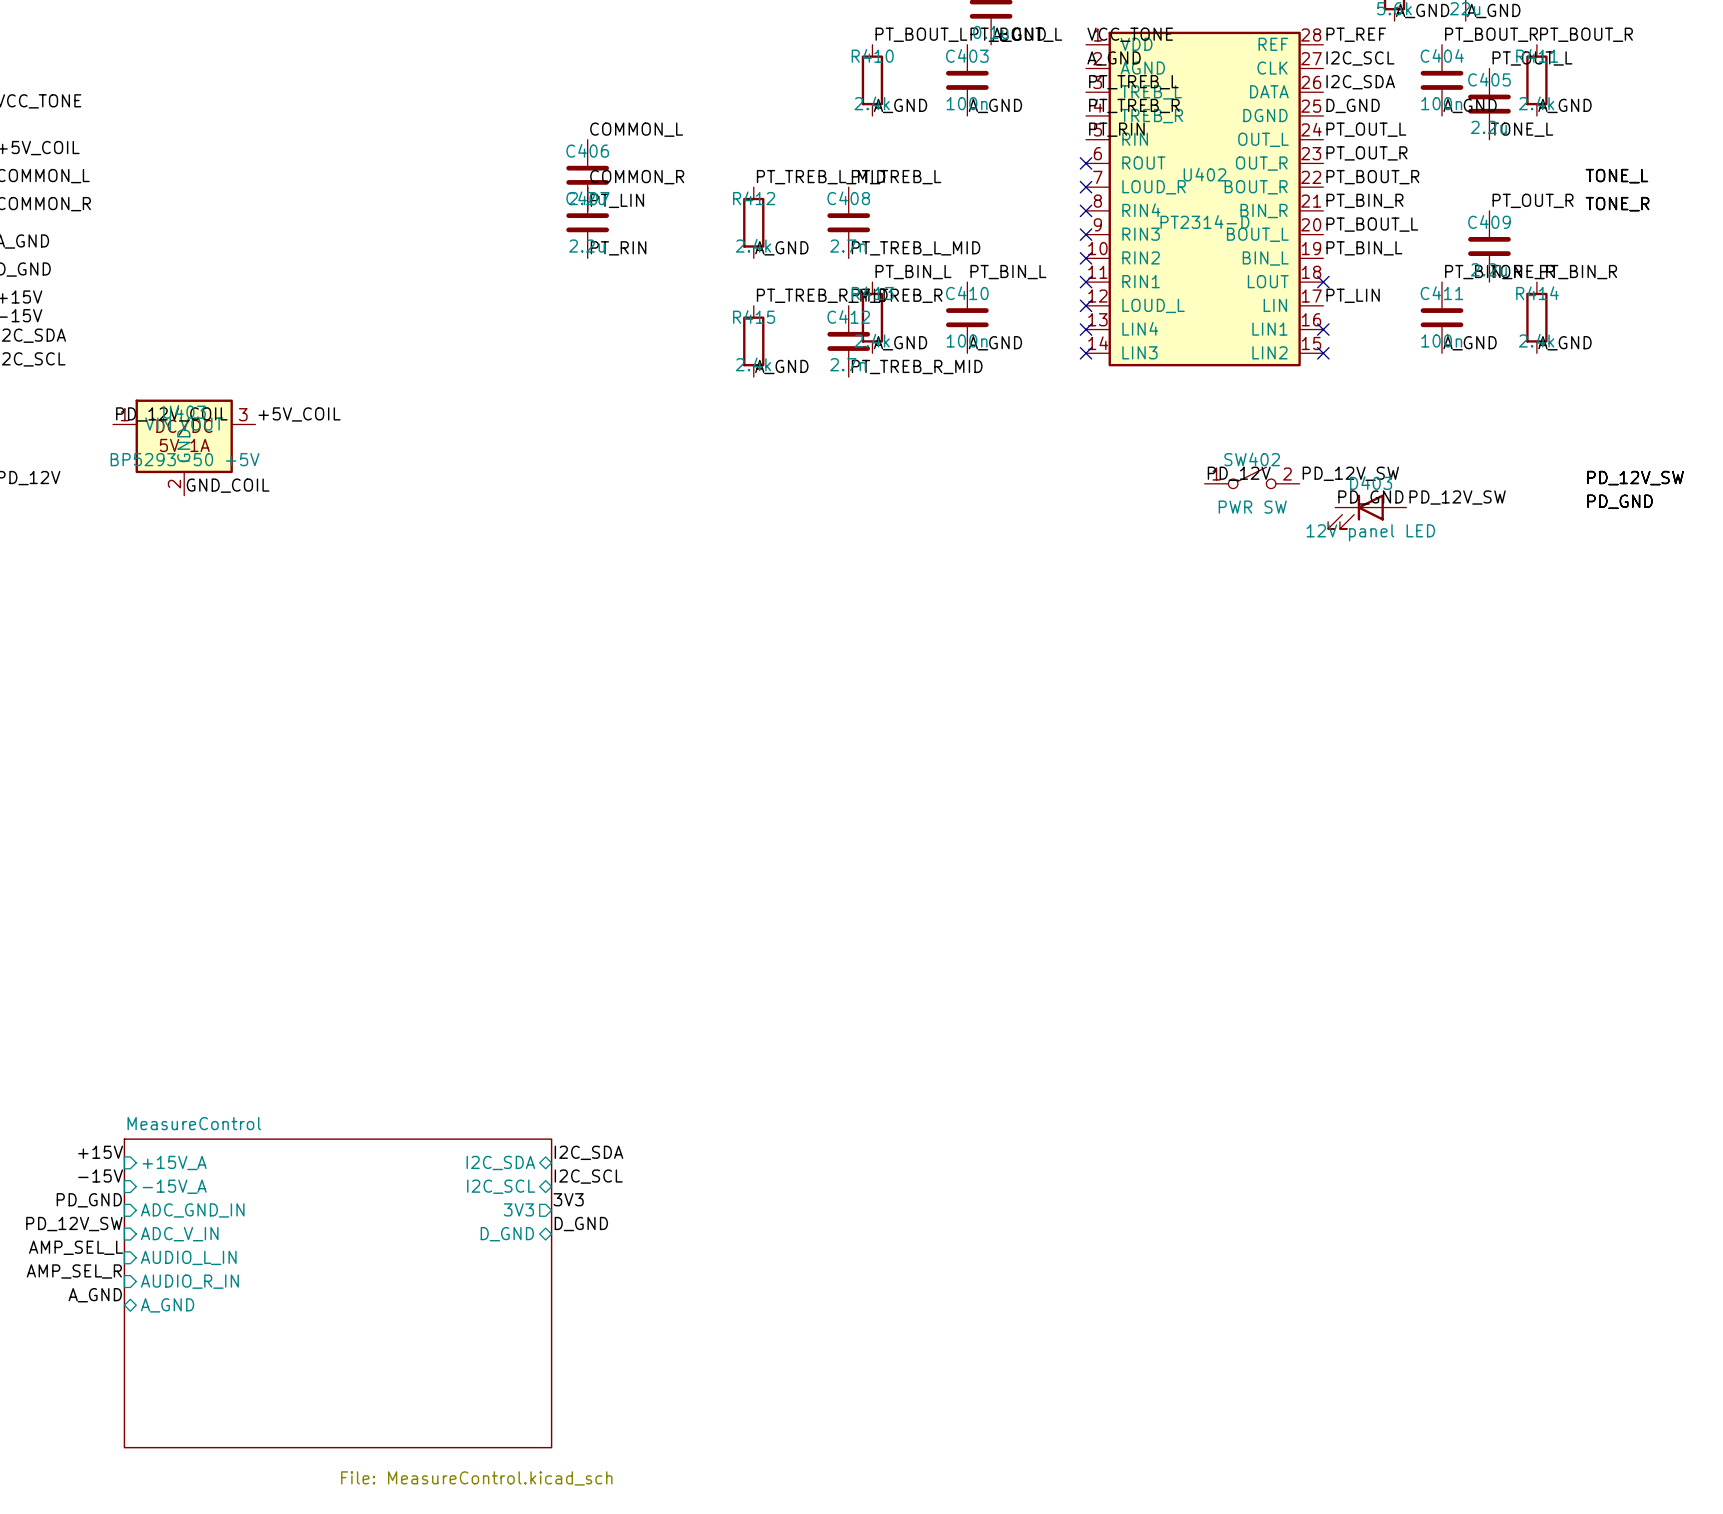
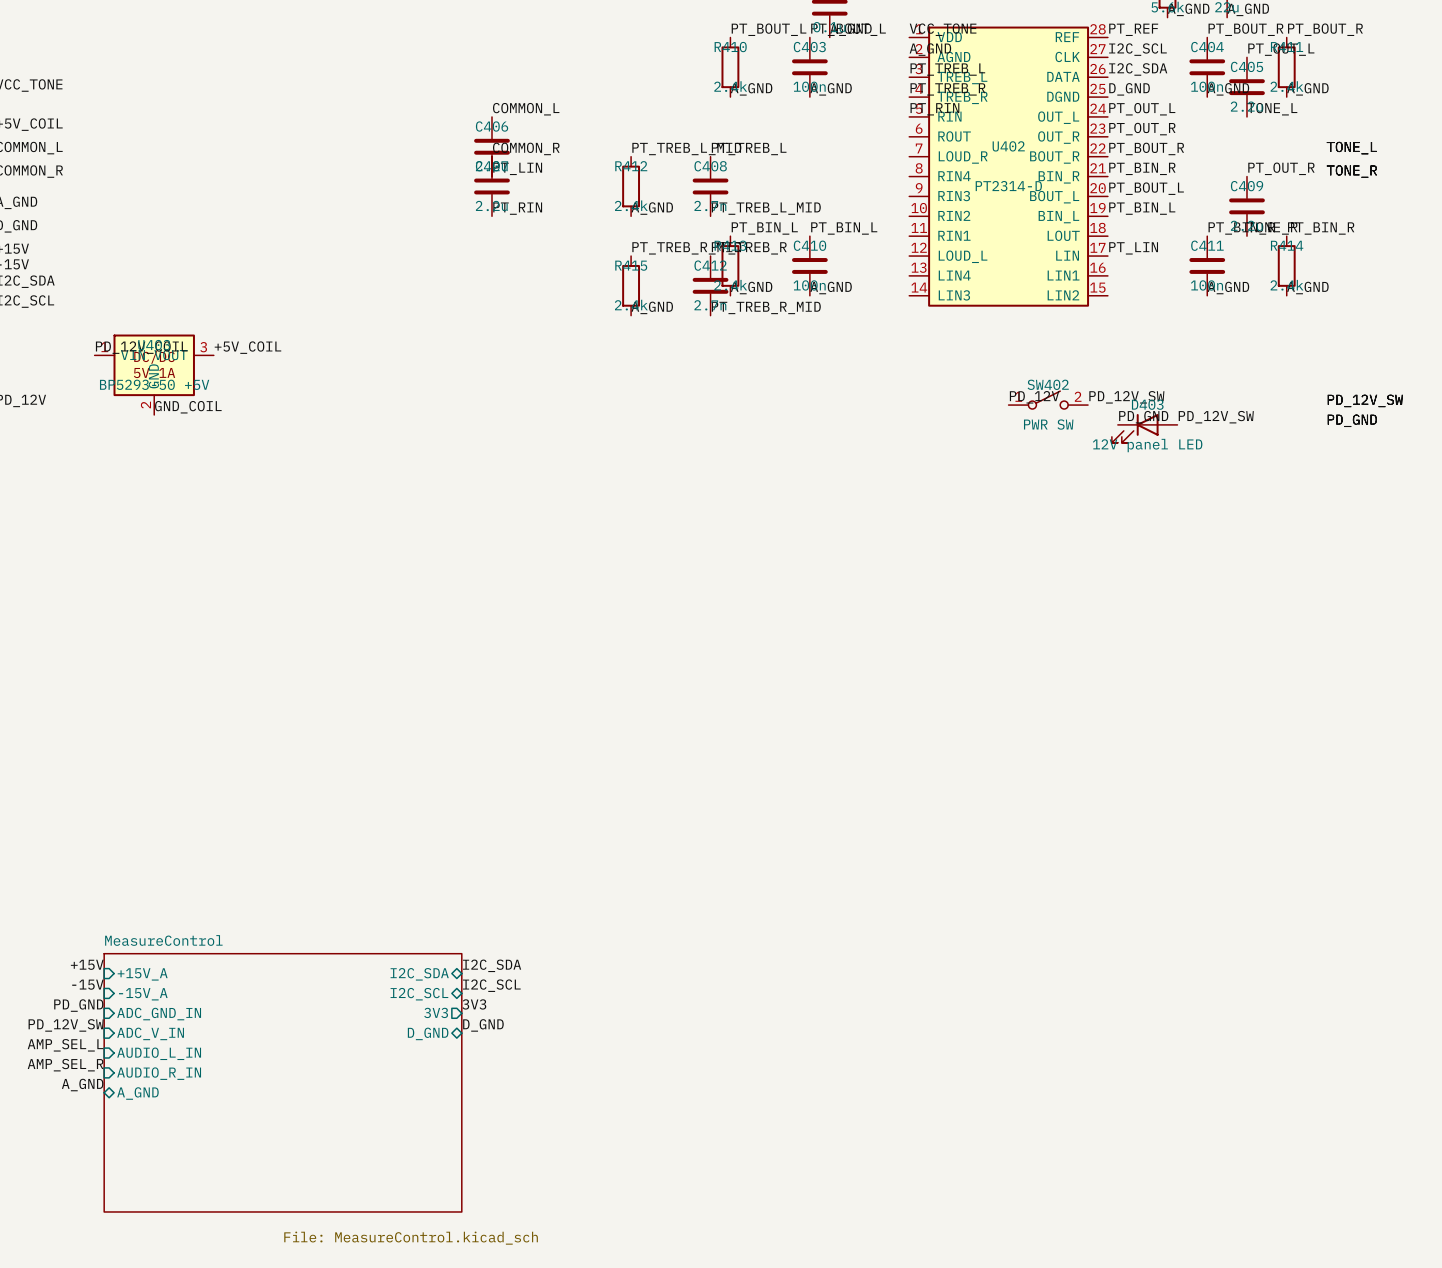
no-connect mark: (1086, 163) -> none
no-connect mark: (1086, 187) -> none
no-connect mark: (1086, 210) -> none
no-connect mark: (1086, 234) -> none
no-connect mark: (1086, 258) -> none
no-connect mark: (1086, 282) -> none
no-connect mark: (1323, 282) -> none
no-connect mark: (1086, 305) -> none
no-connect mark: (1086, 329) -> none
no-connect mark: (1323, 329) -> none
no-connect mark: (1086, 353) -> none
no-connect mark: (1323, 353) -> none

